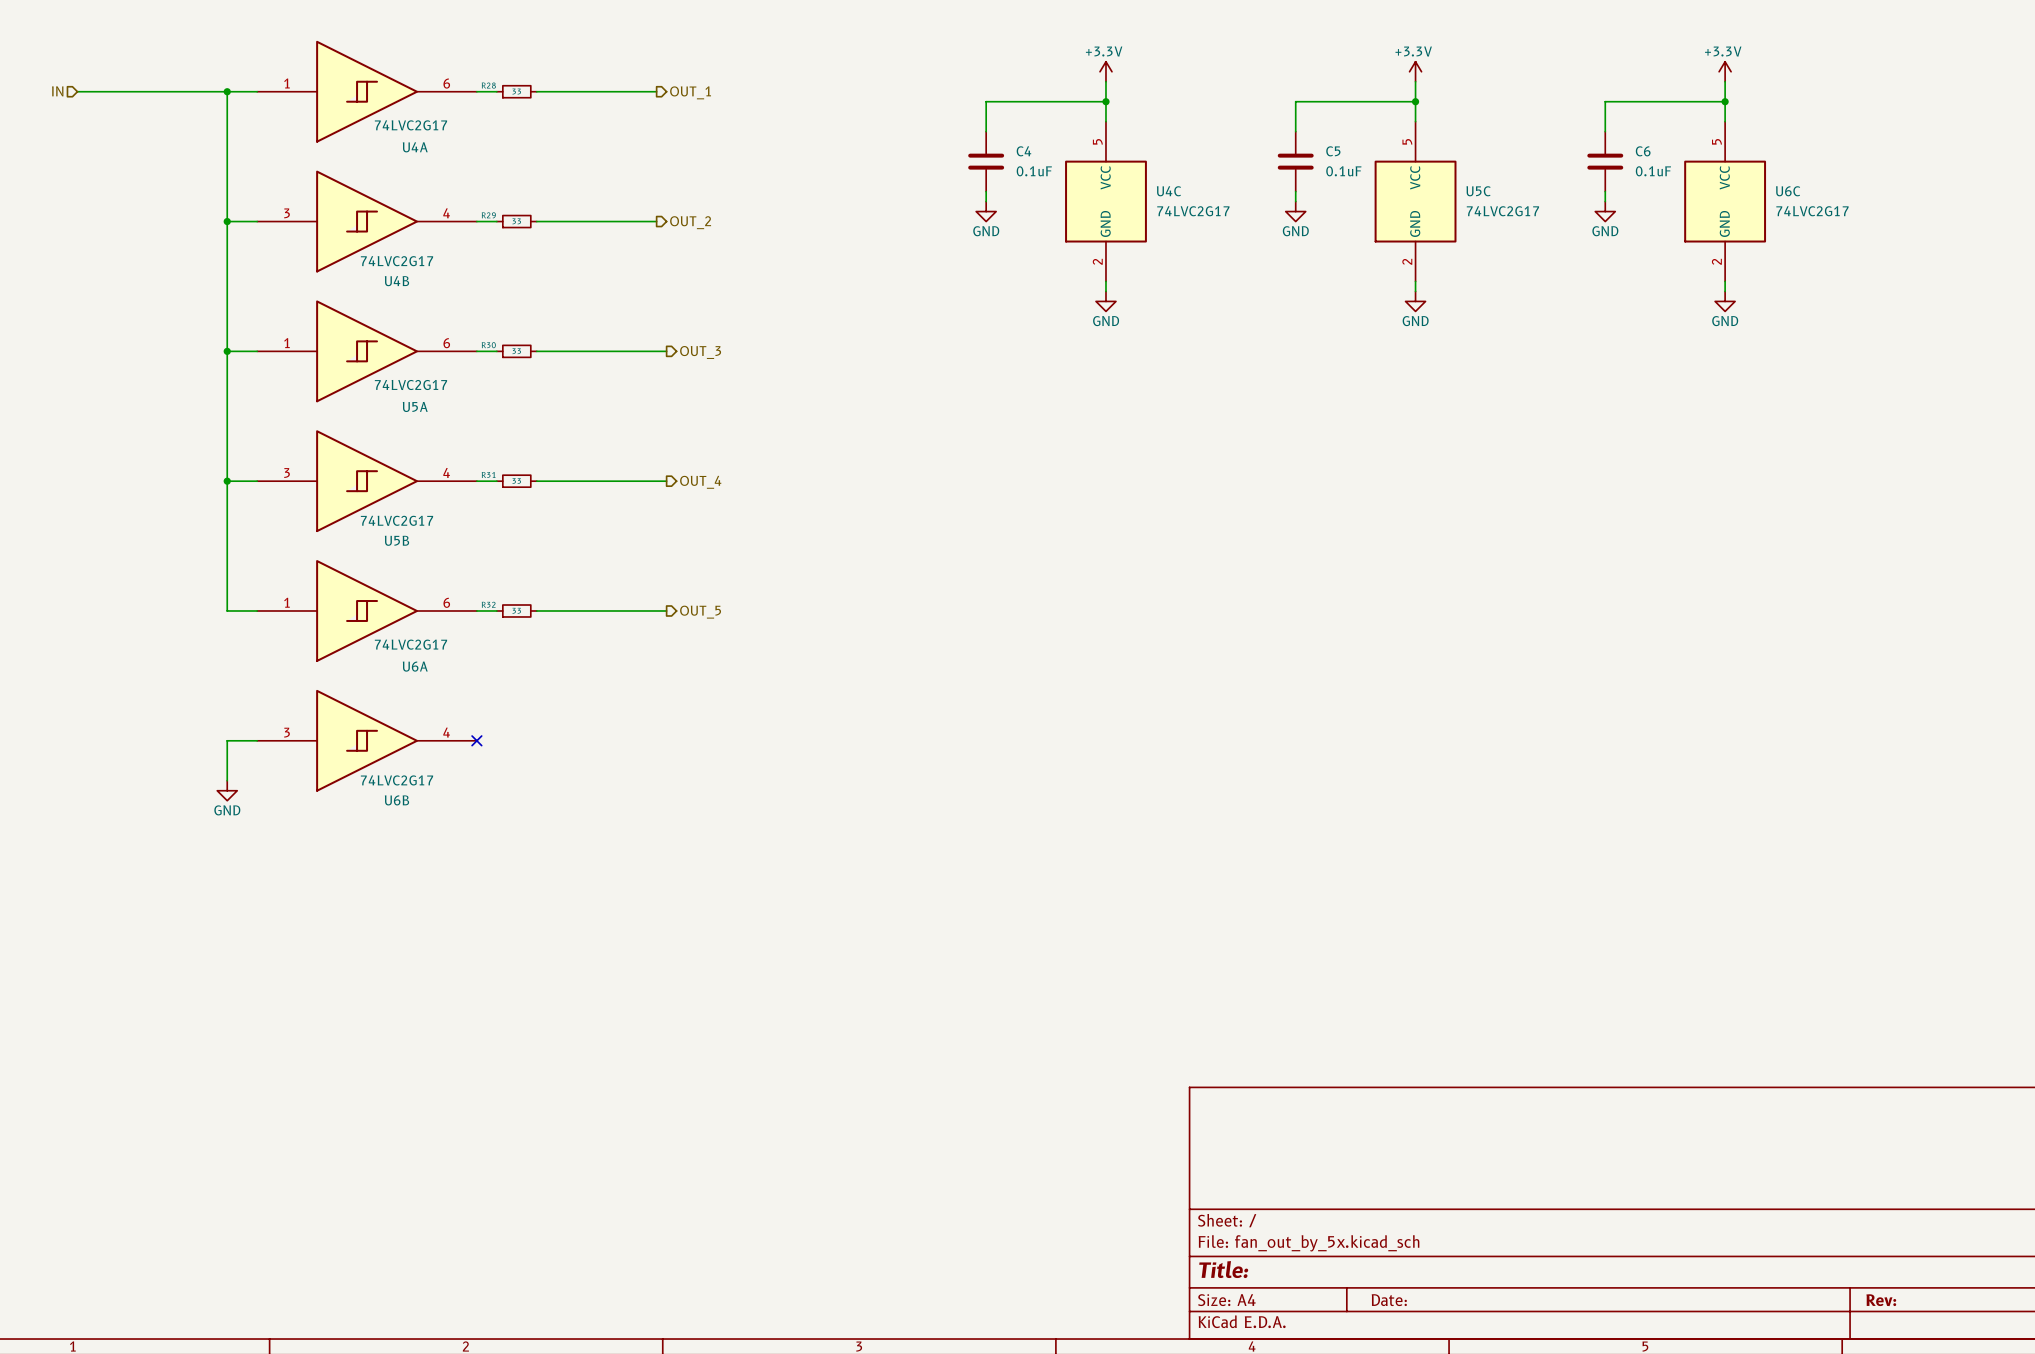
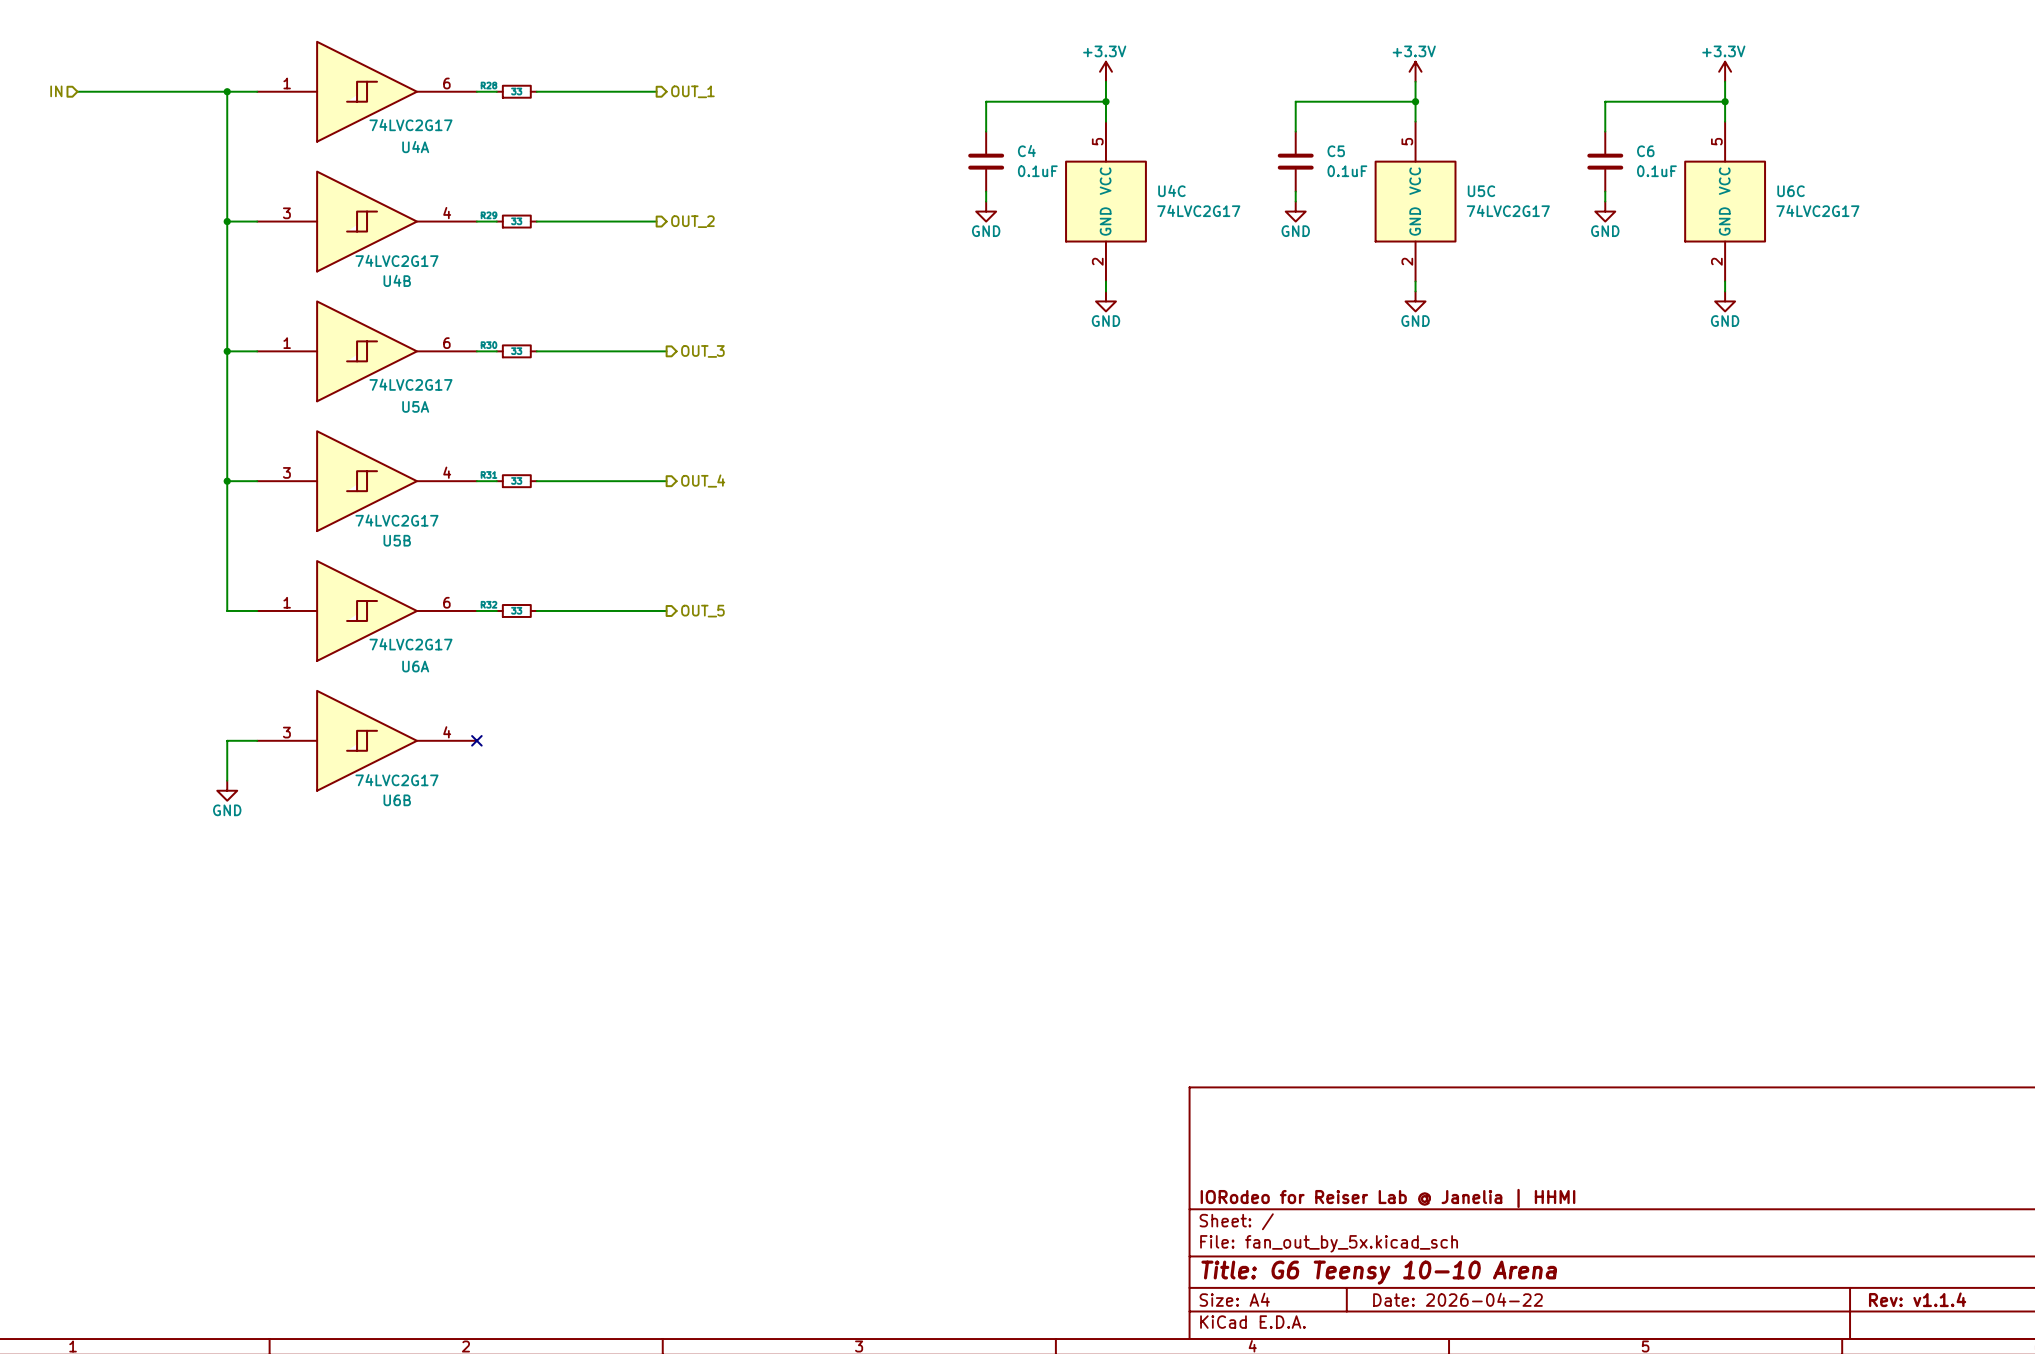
title block: none -> IORodeo for Reiser Lab @ Janelia | HHMI (1387, 1198)
title block: Title: (1223, 1269) -> Title: G6 Teensy 10-10 Arena (1379, 1272)
title block: Date: (1389, 1300) -> Date: 2026-04-22 (1457, 1299)
title block: Rev: (1881, 1300) -> Rev: v1.1.4 (1917, 1299)

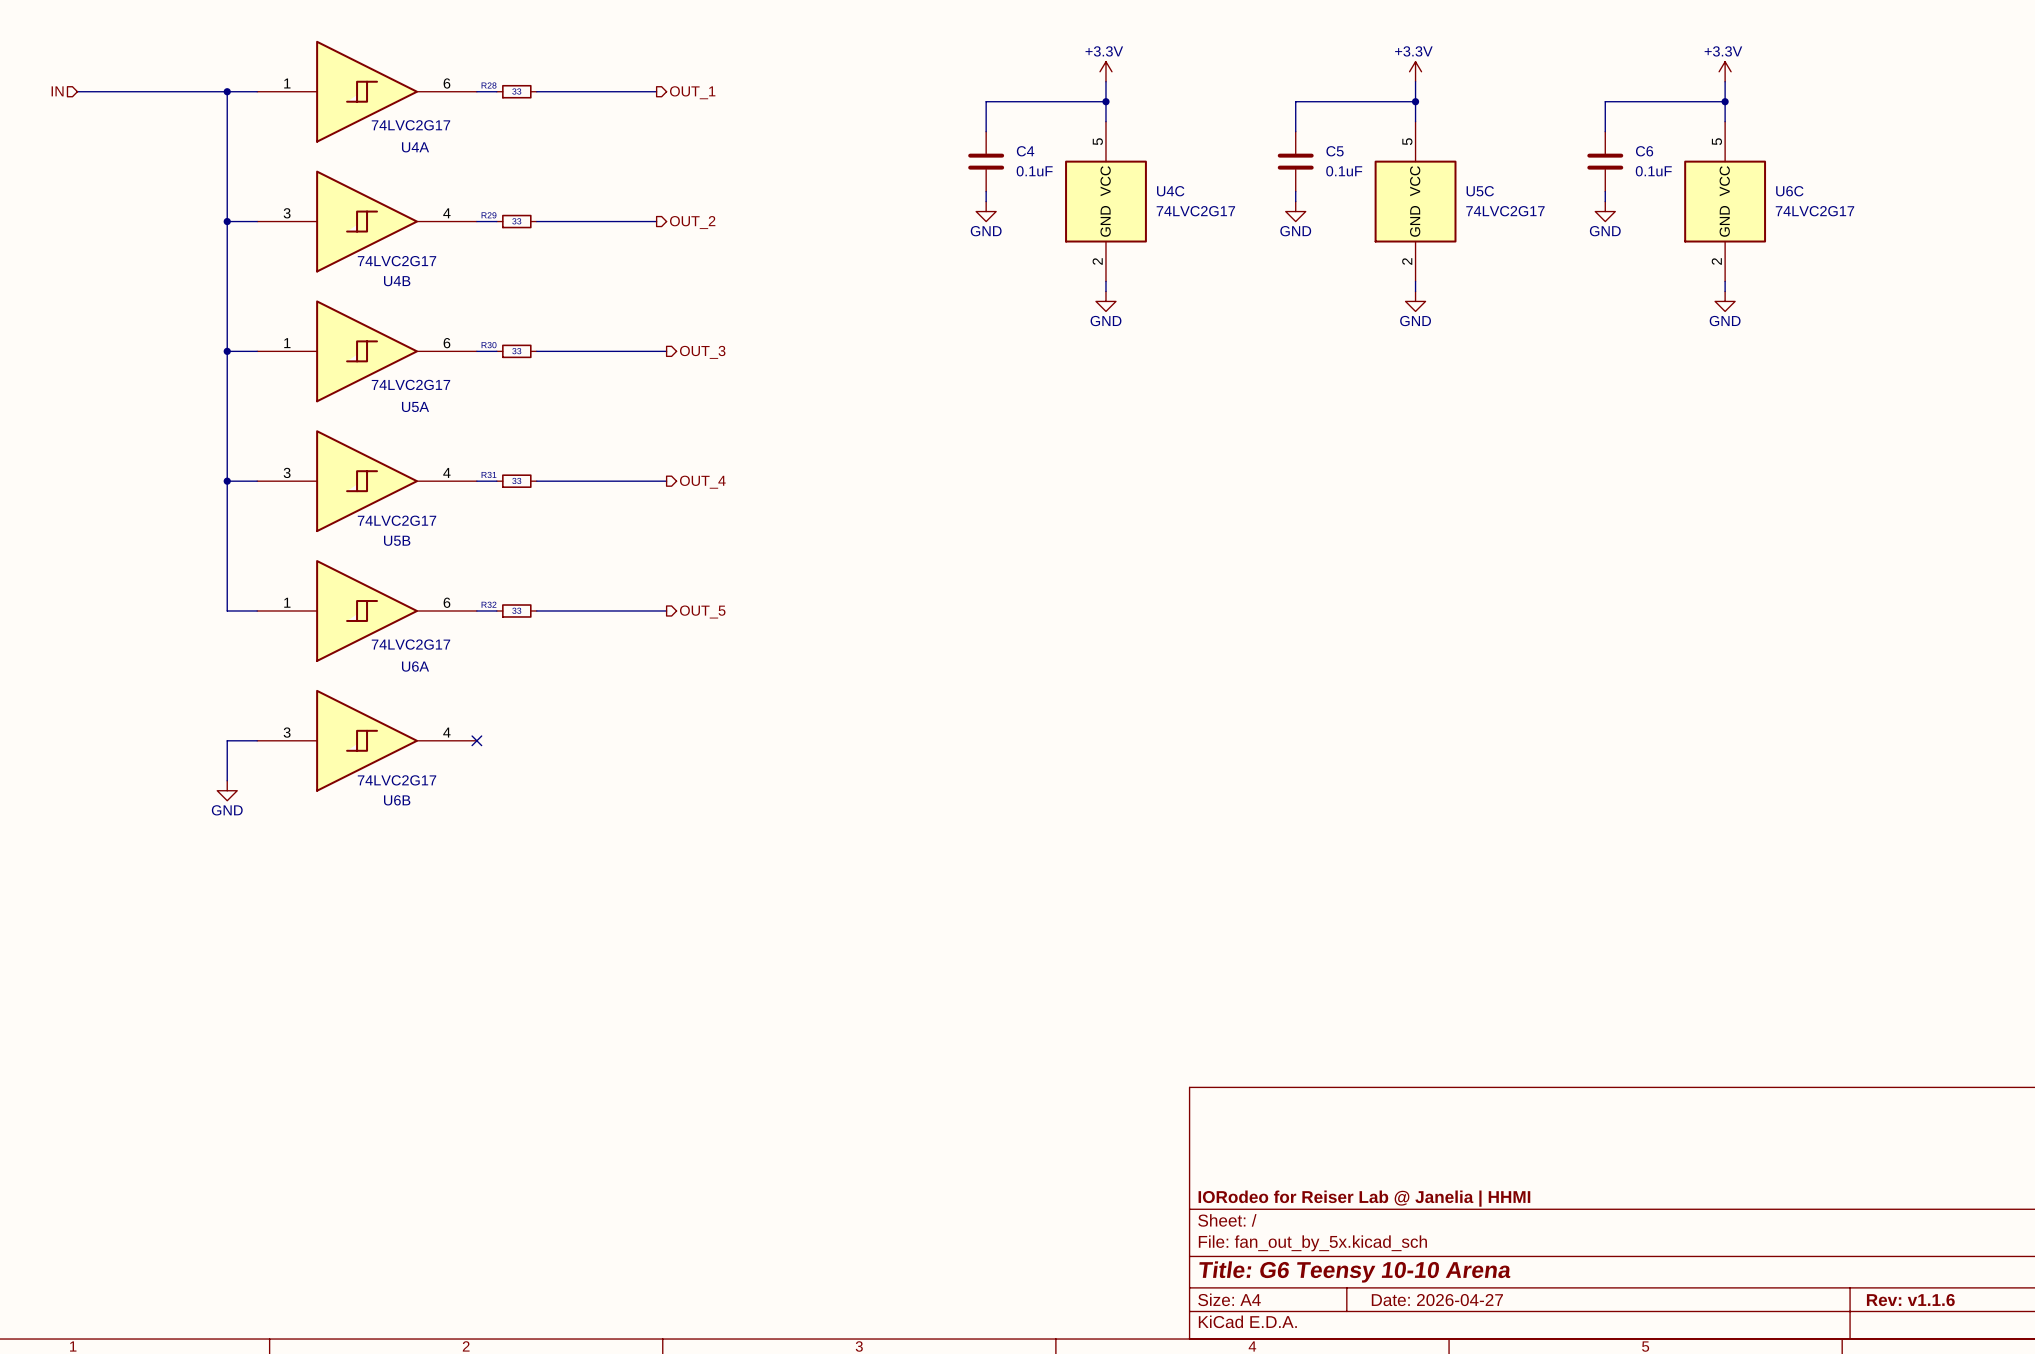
title block: Date: 2026-04-22 (1457, 1299) -> Date: 2026-04-27 (1437, 1300)
title block: Rev: v1.1.4 (1917, 1299) -> Rev: v1.1.6 (1910, 1300)

